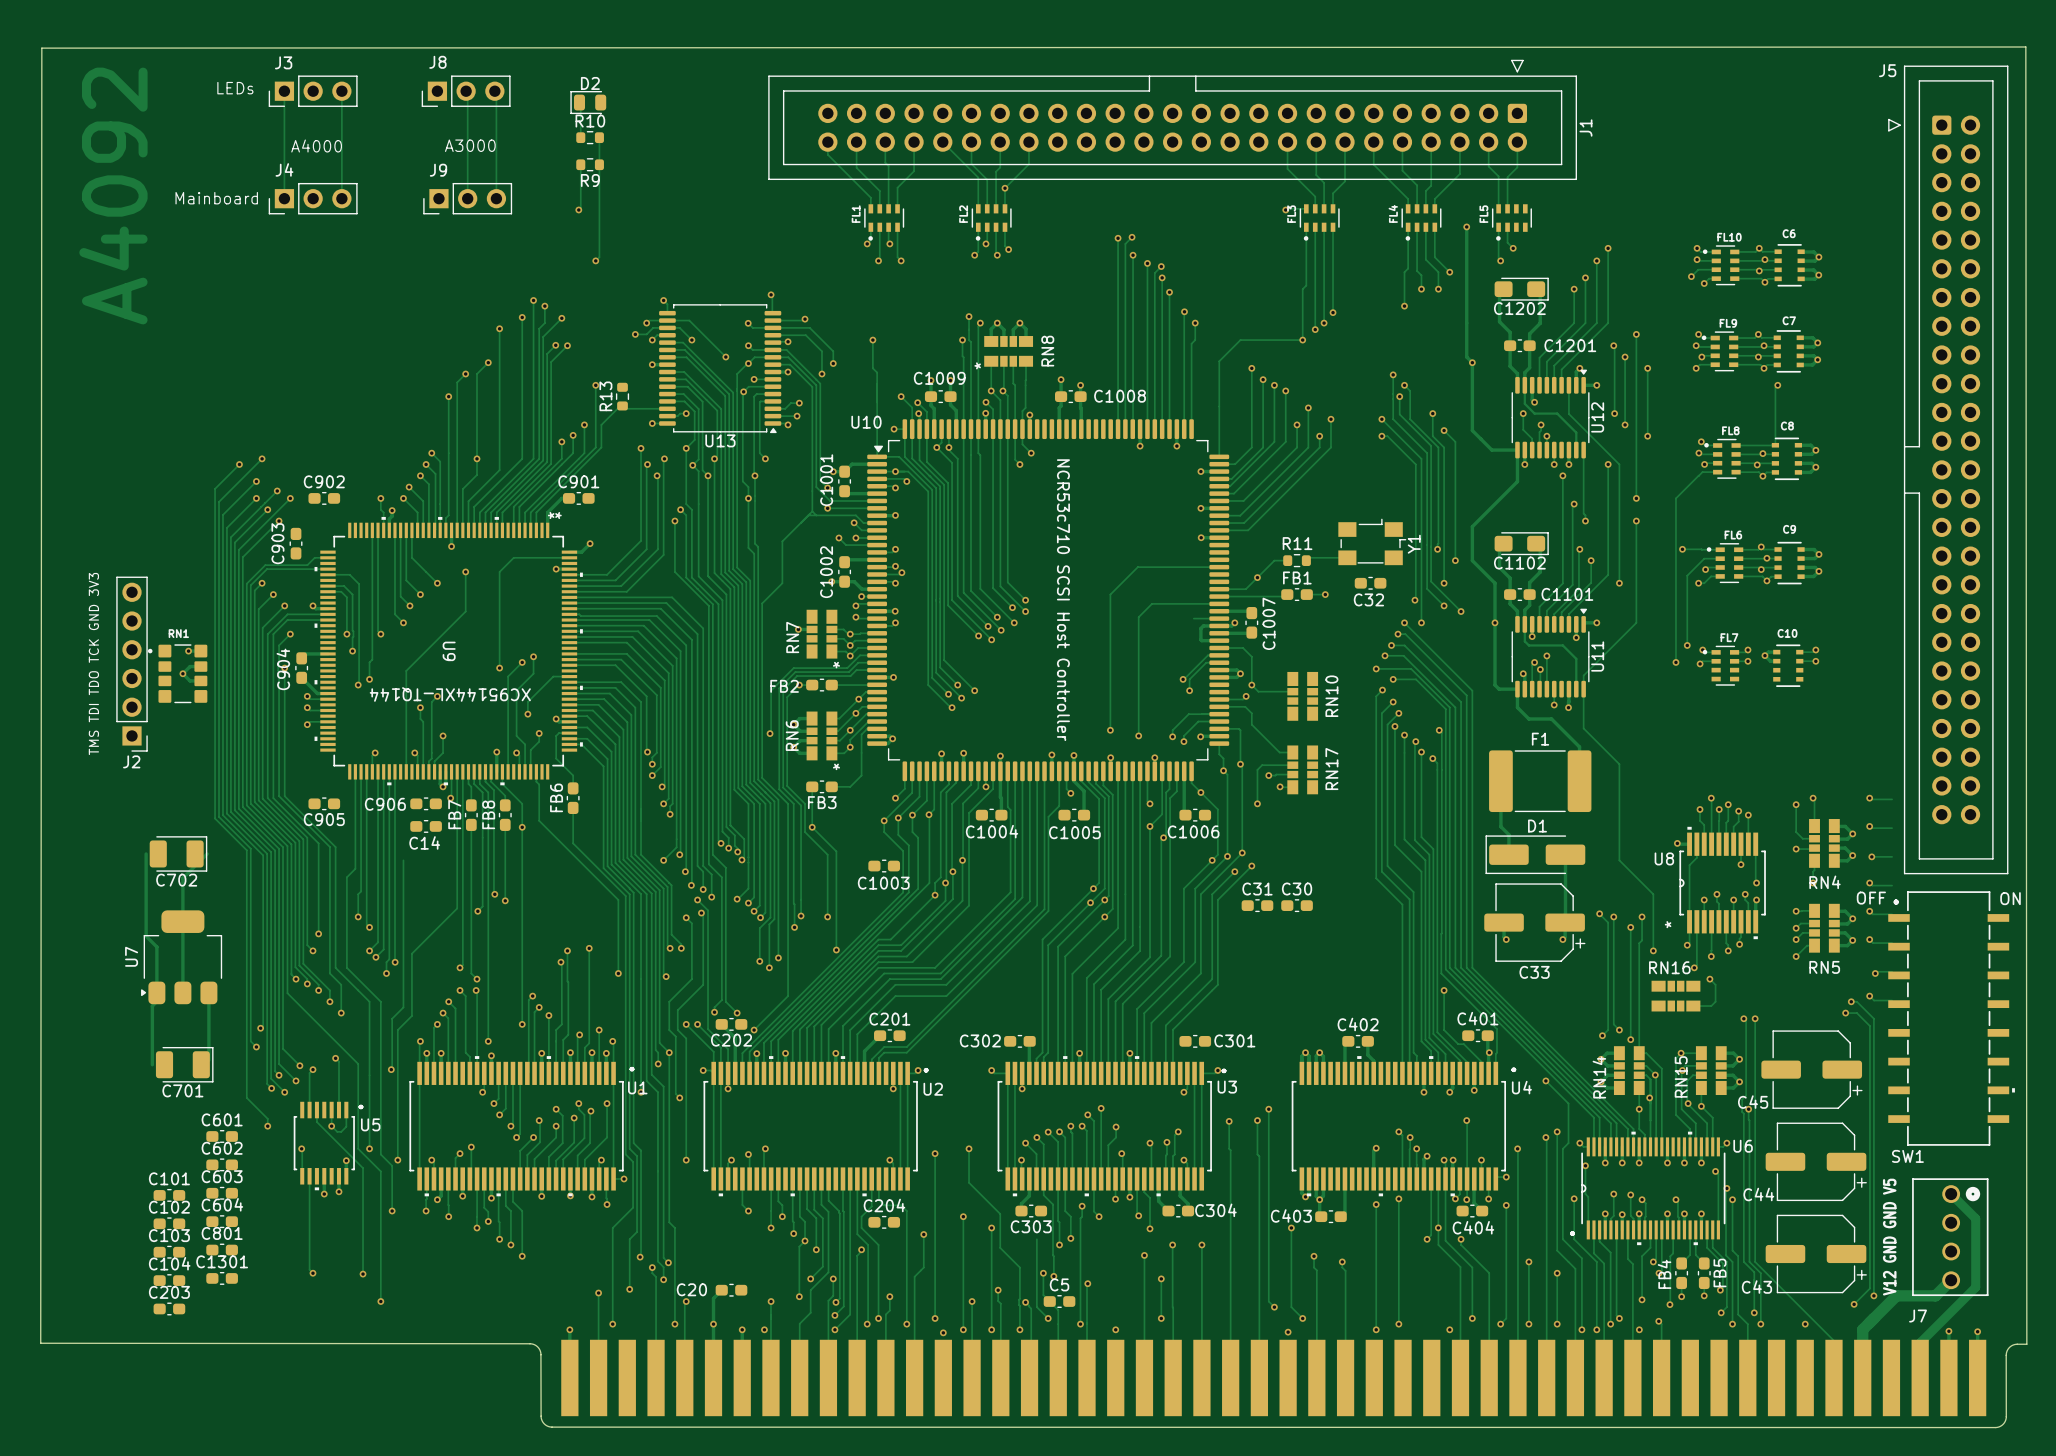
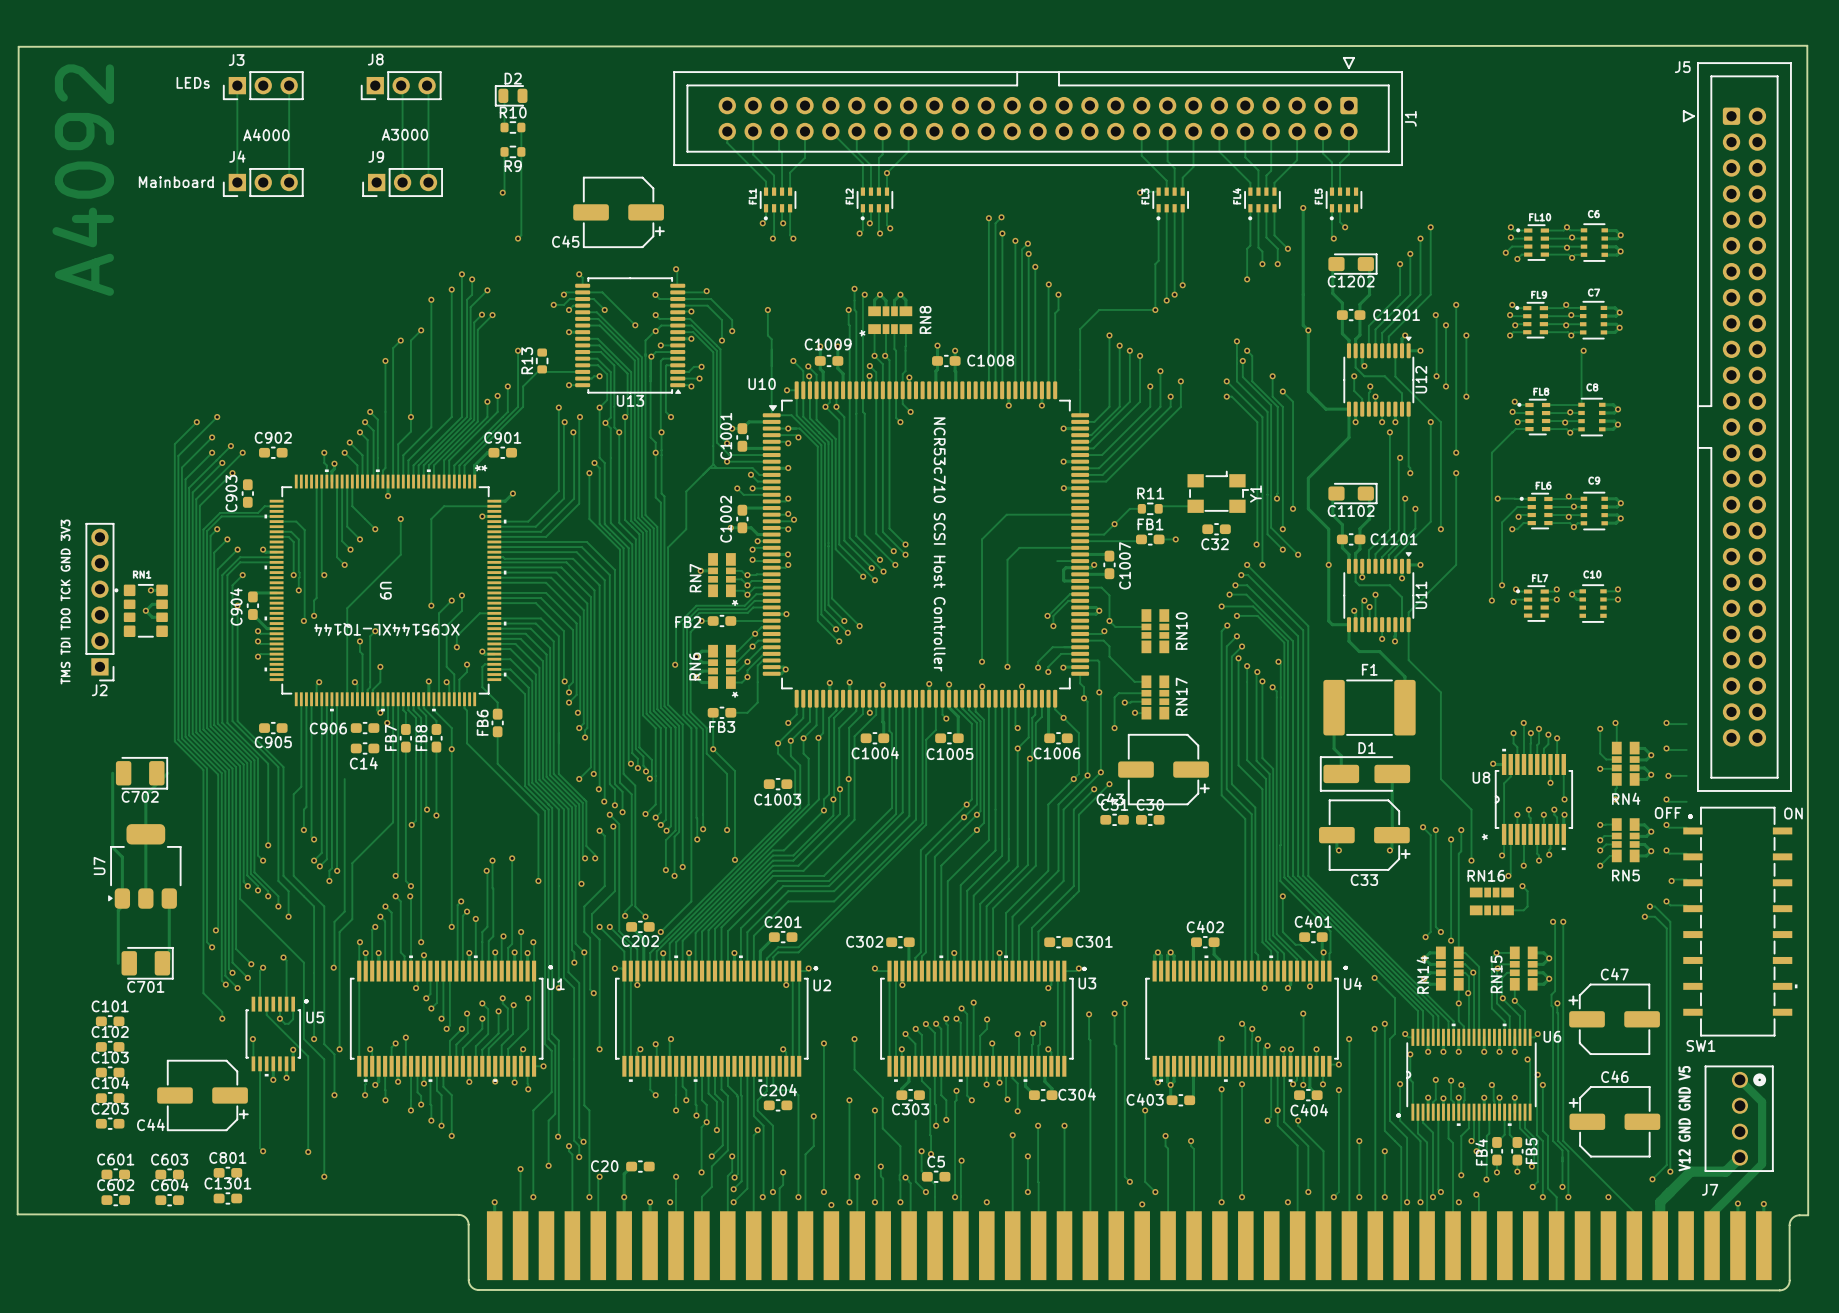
C45 footprint: [1761, 1030, 1863, 1109] -> [573, 177, 665, 248]
C47: none -> (1614, 1019)
C601 position: (222, 1136) -> (115, 1174)
C44 position: (1816, 1161) -> (202, 1095)
C602 position: (222, 1164) -> (115, 1200)
C603 position: (222, 1193) -> (169, 1174)
C101 position: (169, 1195) -> (110, 1021)
C43 footprint: [1765, 1214, 1867, 1294] -> [1118, 734, 1210, 805]
C604 position: (222, 1221) -> (169, 1200)
C102 position: (169, 1223) -> (110, 1046)
C46: none -> (1614, 1121)
C801 position: (222, 1250) -> (227, 1172)
C103 position: (169, 1252) -> (110, 1072)
C1301 position: (222, 1278) -> (227, 1198)
C104 position: (169, 1280) -> (110, 1098)
C203 position: (169, 1308) -> (110, 1123)

